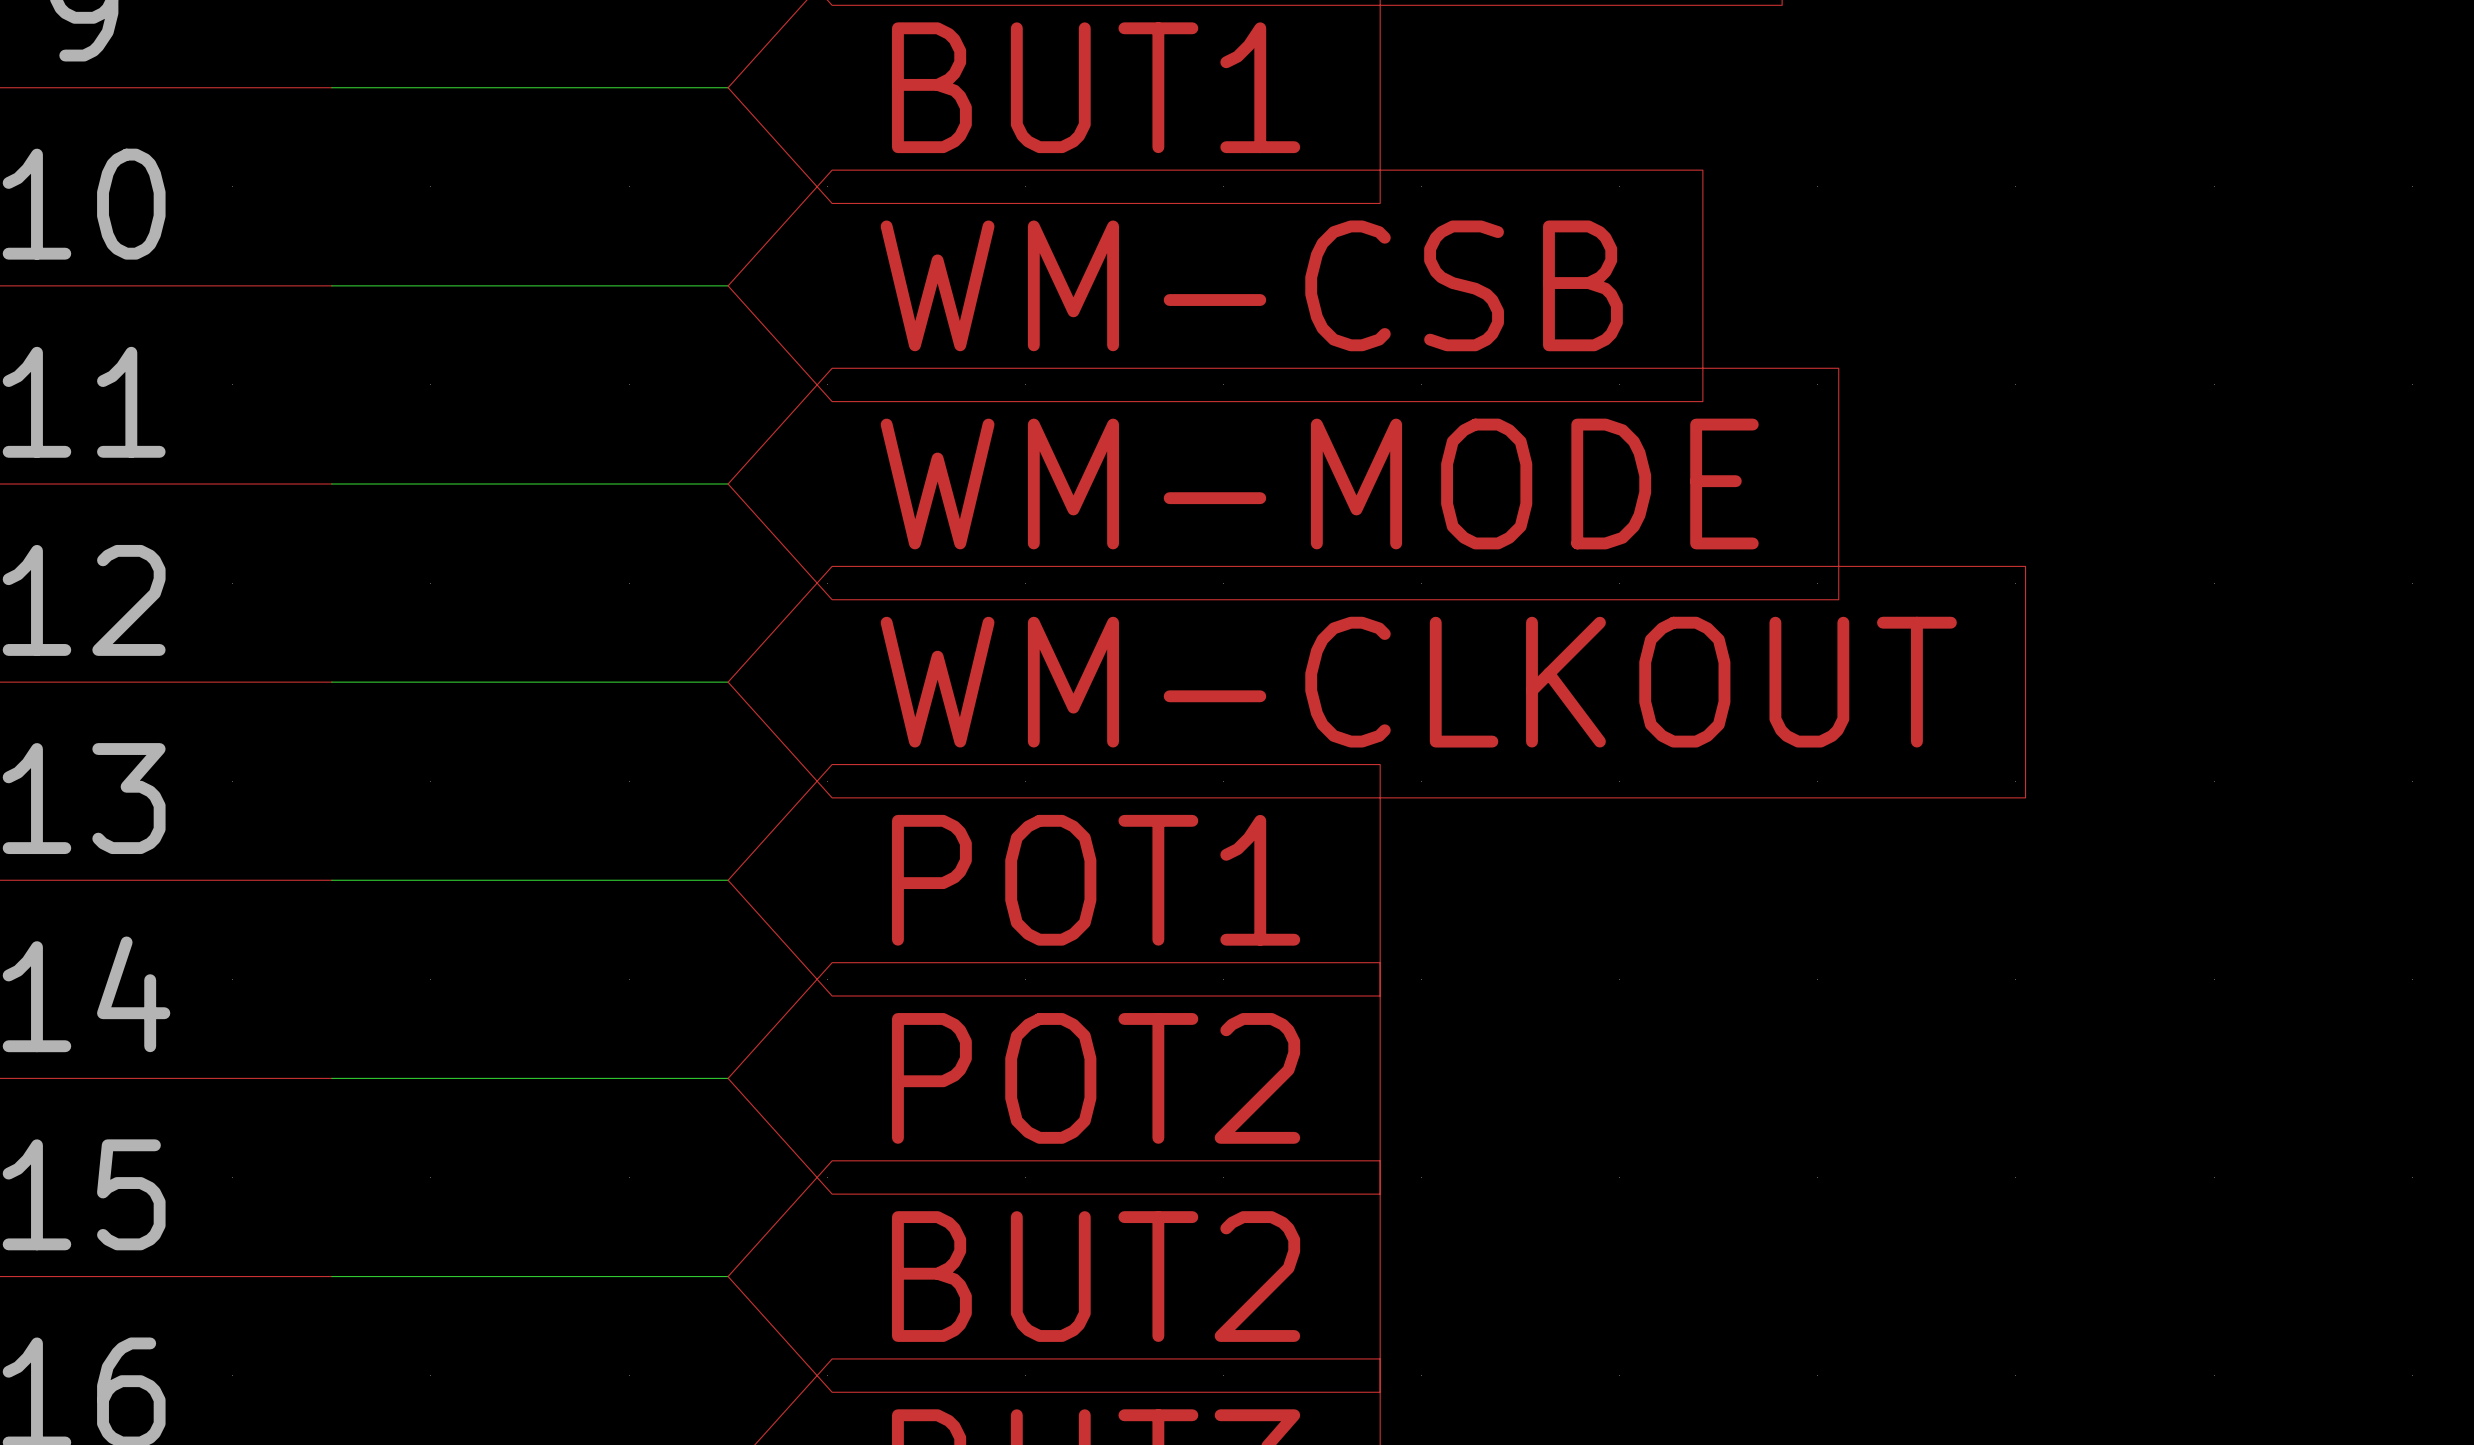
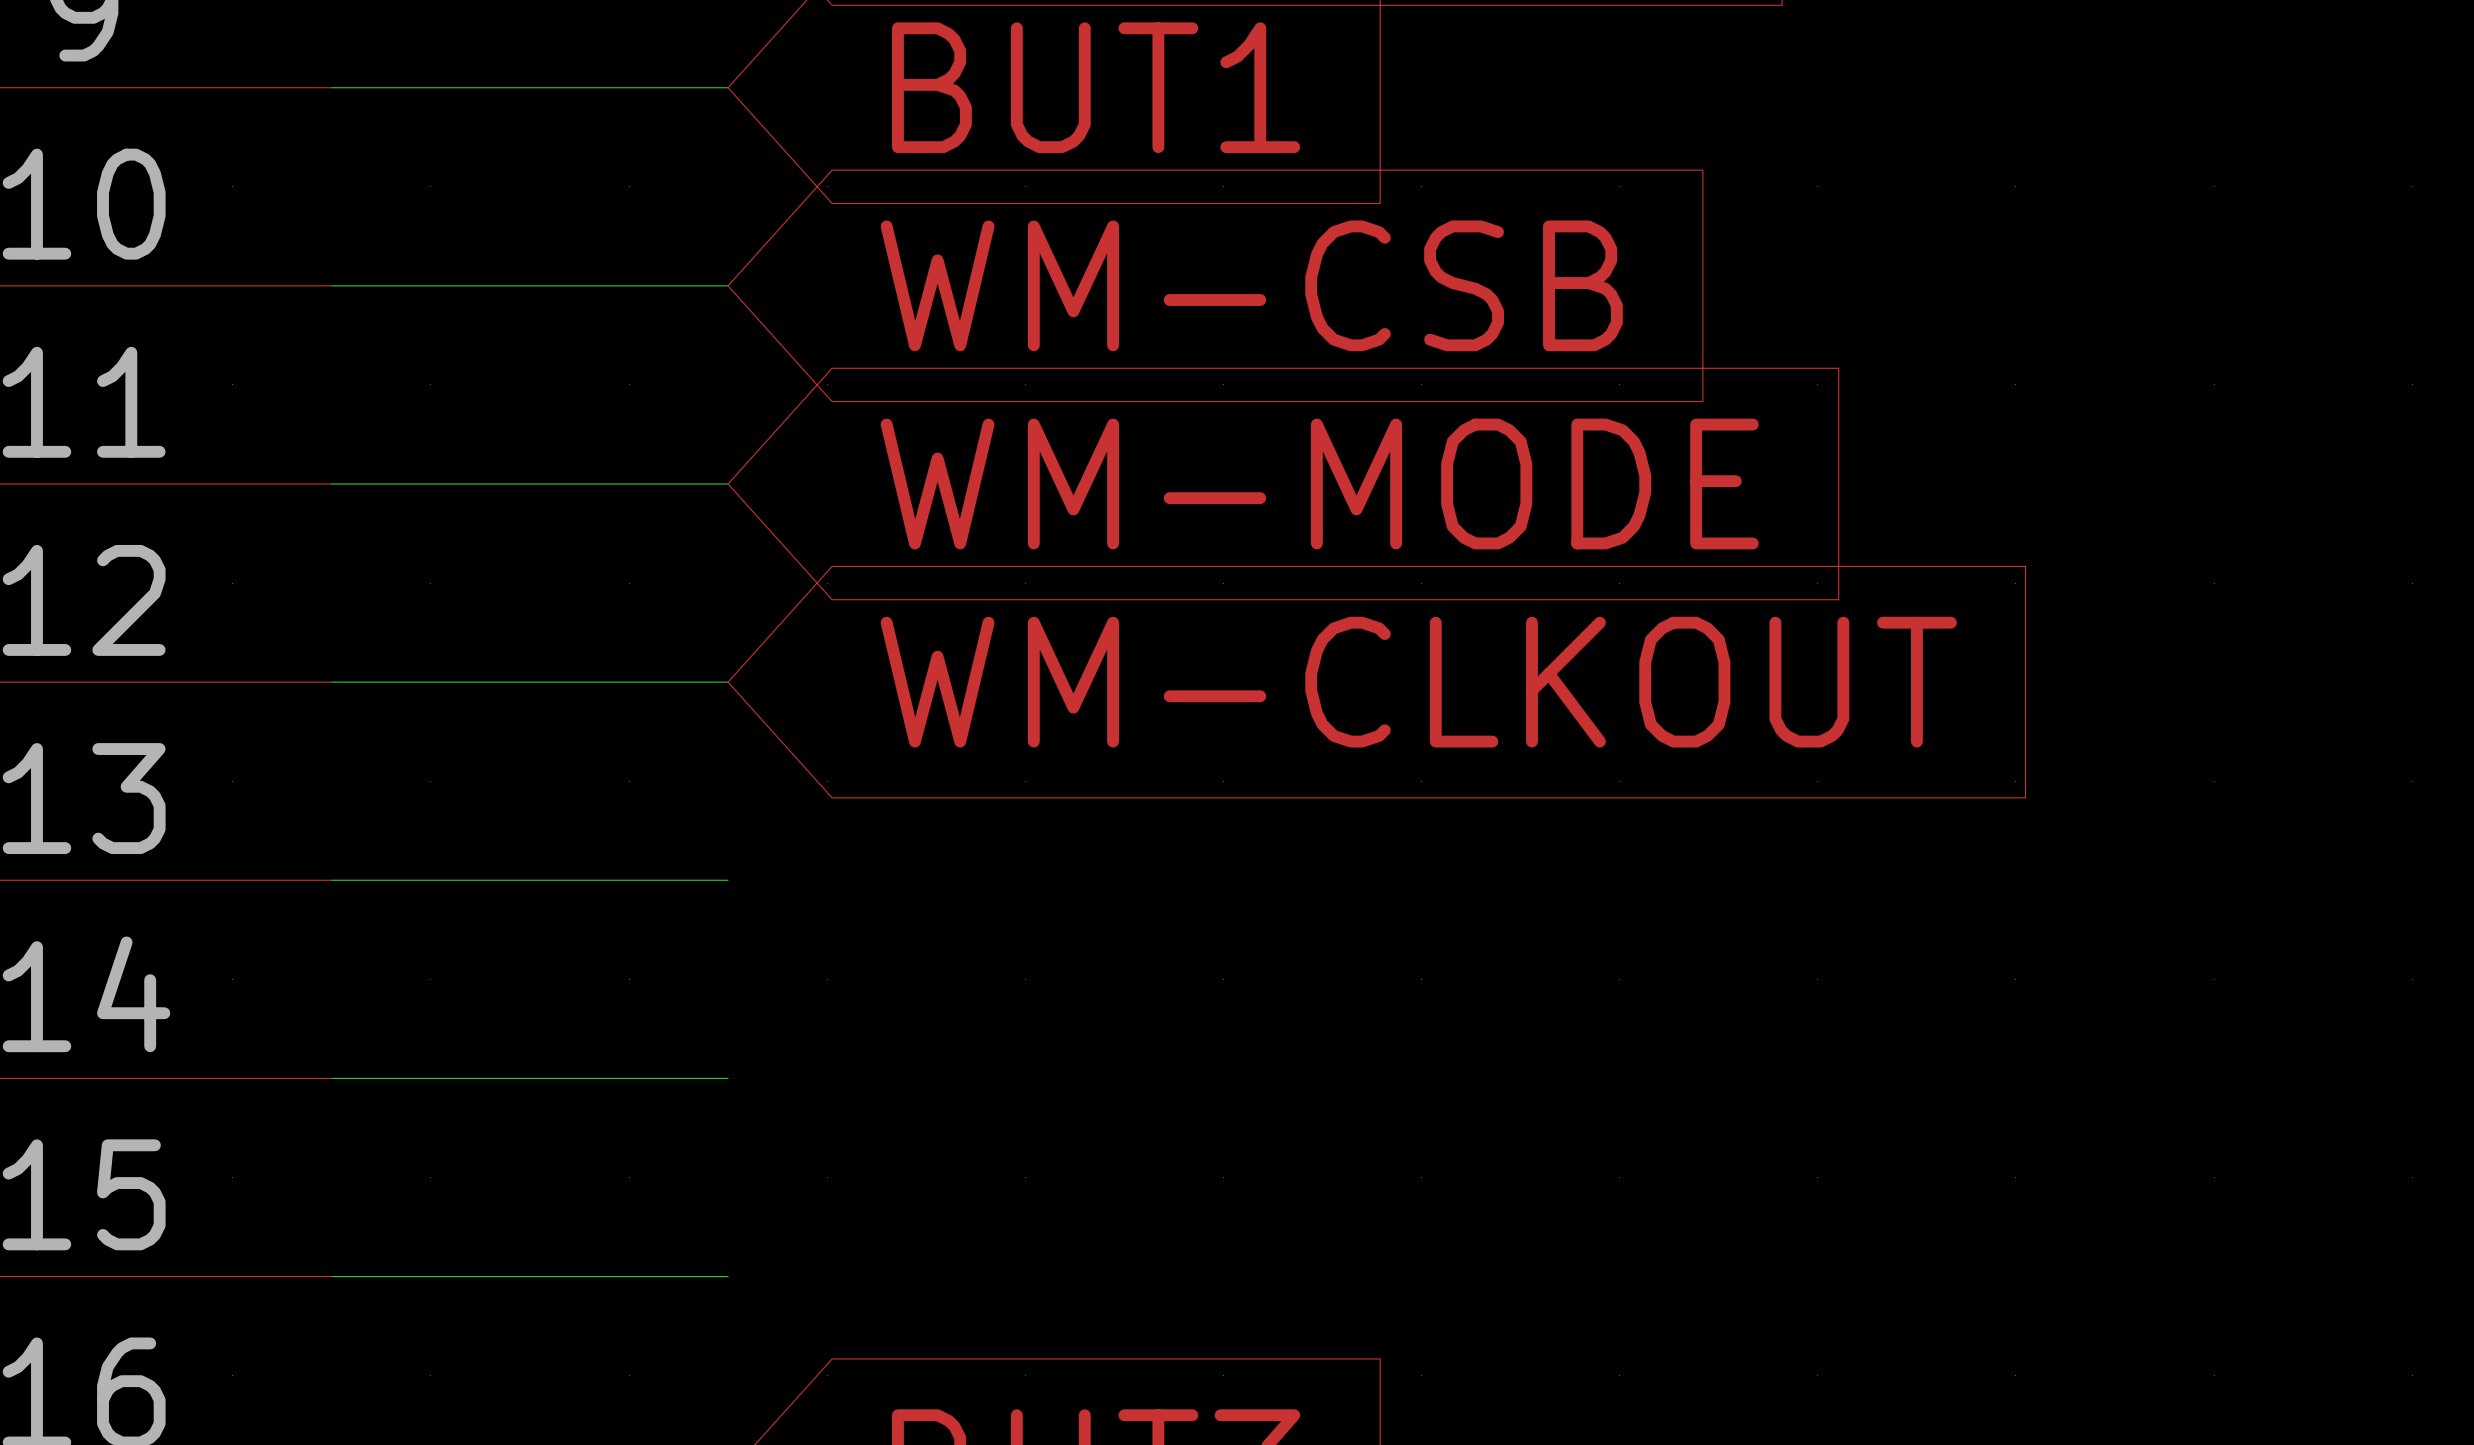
global label: POT1 (1096, 880) -> none
global label: POT2 (1096, 1078) -> none
global label: BUT2 (1096, 1276) -> none

